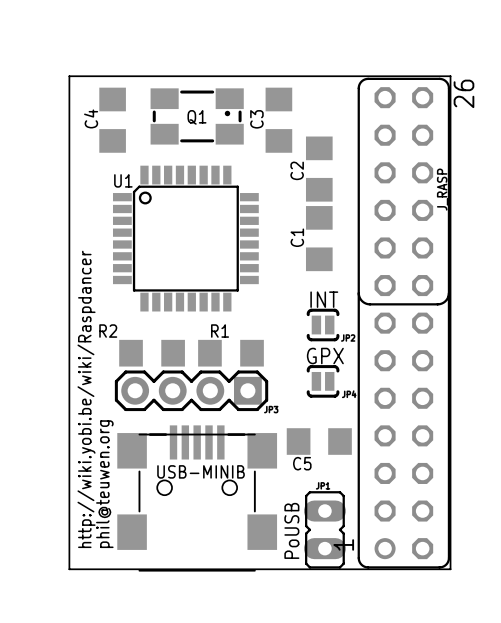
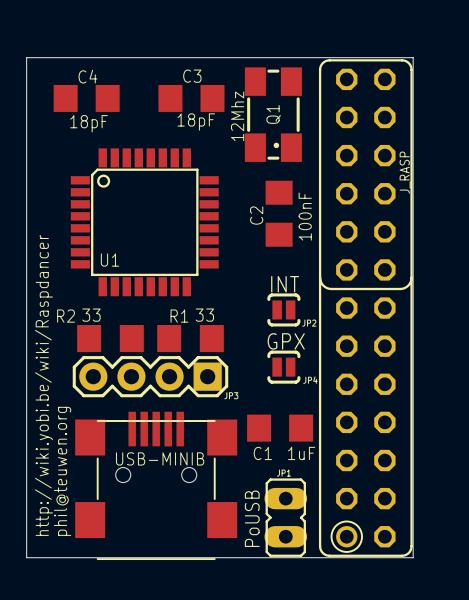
J_RASP footprint: [357, 77, 451, 569] -> [318, 59, 413, 557]
Q1 rotation: 0° (197, 116) -> 90° clockwise (273, 114)
Q1 position: (197, 116) -> (273, 114)
C4 rotation: 0° (112, 120) -> 90° clockwise (86, 98)
C3 rotation: 0° (278, 120) -> 90° clockwise (191, 98)
C3 position: (278, 120) -> (191, 98)
Q1 value: none -> 12Mhz (237, 116)
C3 value: none -> 18pF (196, 122)
C4 value: none -> 18pF (89, 123)
C2 position: (319, 169) -> (279, 213)
U1 name position: U1 (123, 180) -> U1 (109, 260)
C2 value: none -> 100nF (305, 216)
C1: (319, 238) -> none
R2 value: none -> 33 (91, 315)
R1 value: none -> 33 (204, 315)
C5 name: C5 (302, 463) -> C1 (262, 453)
C5 value: none -> 1uF (301, 453)

